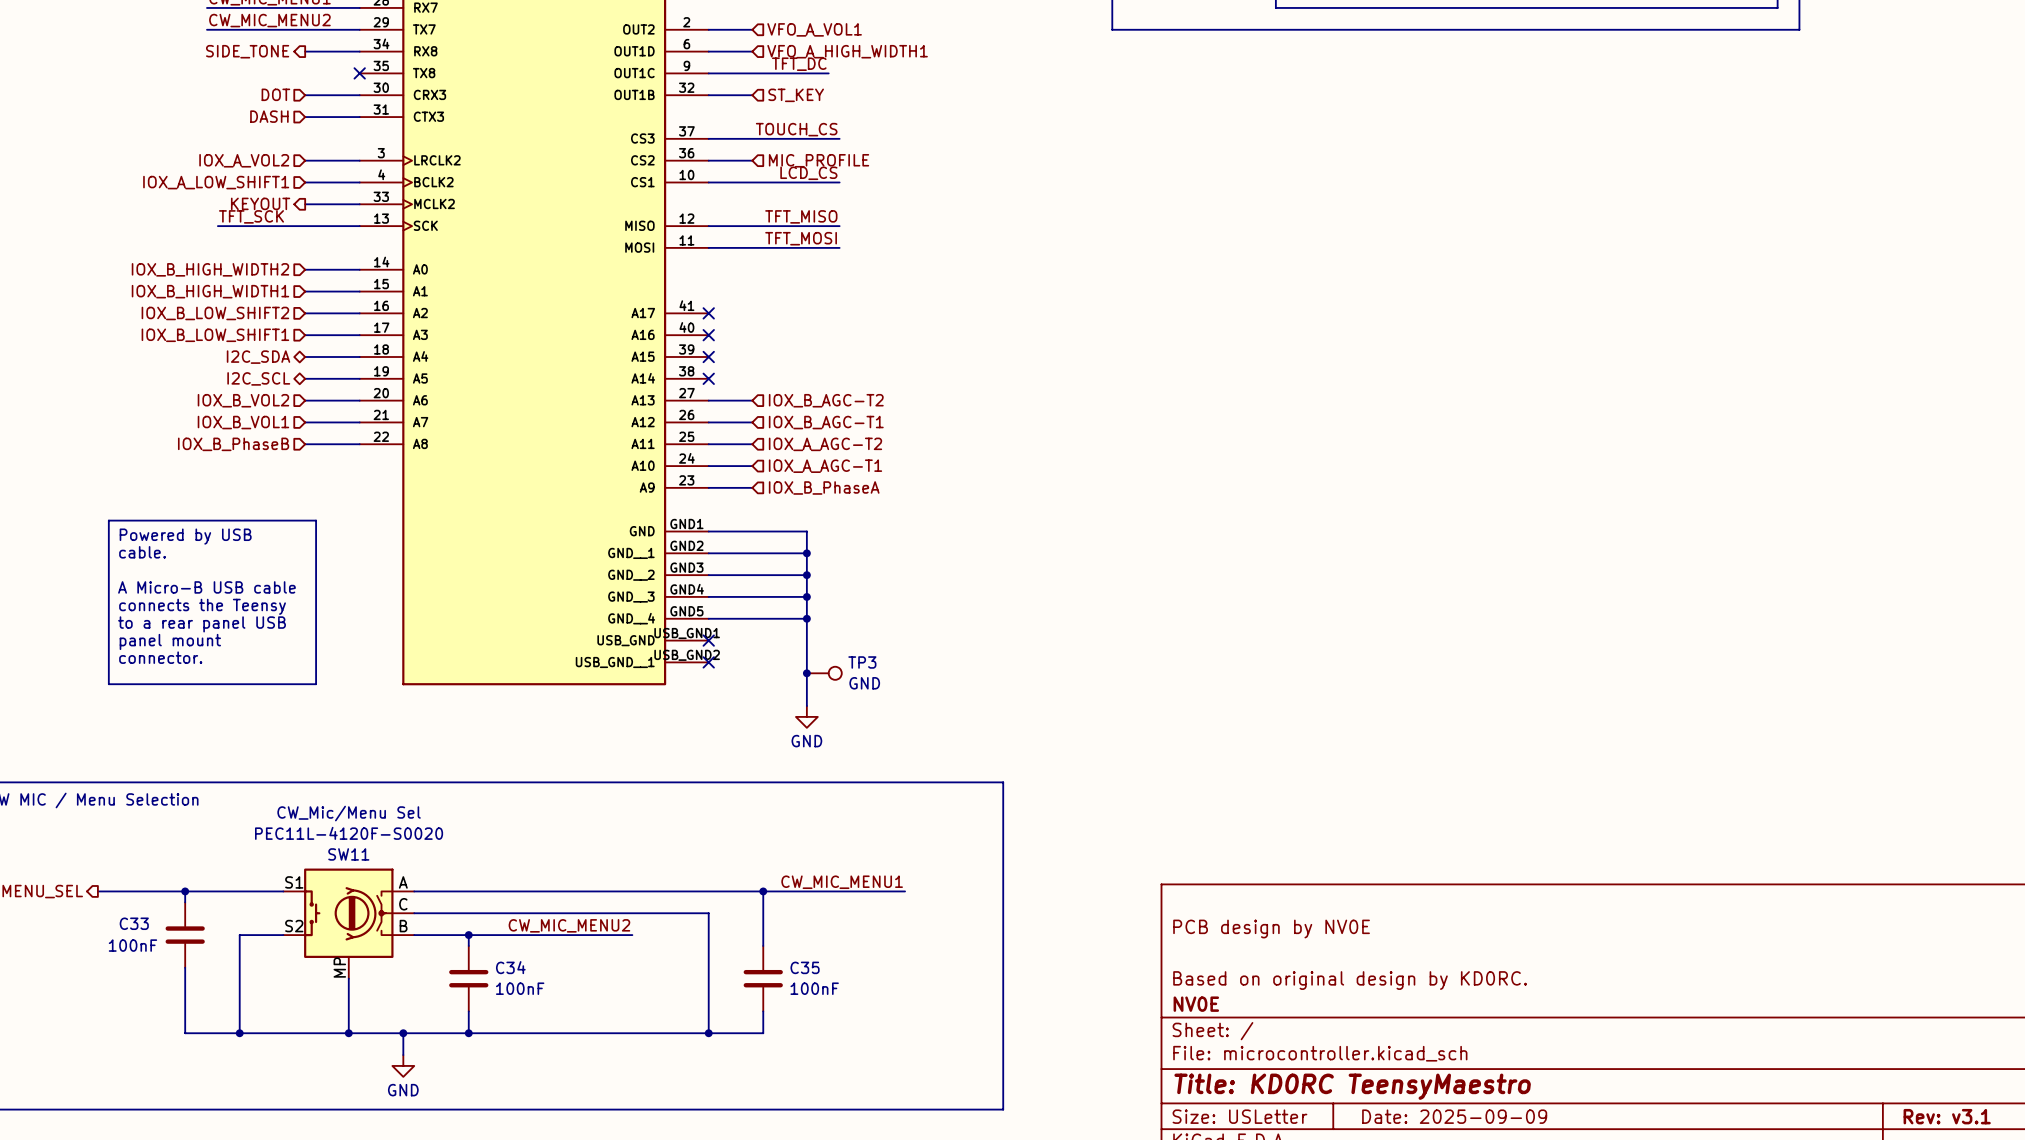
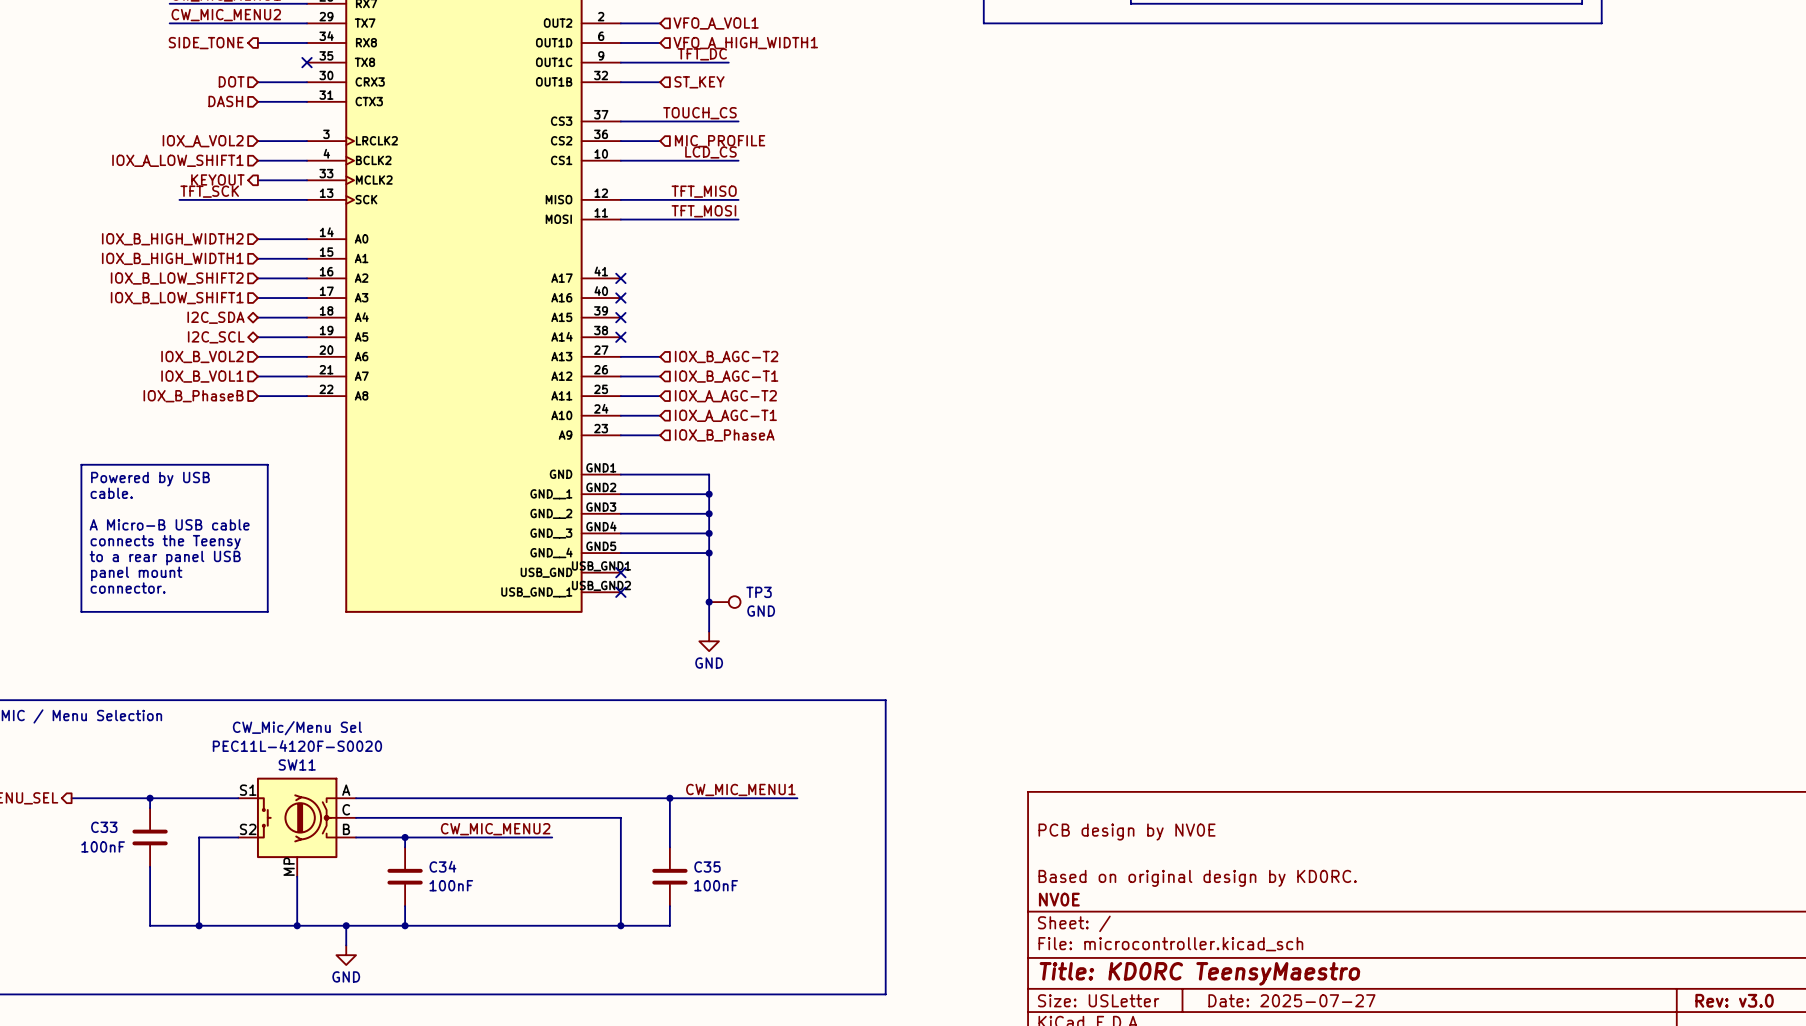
title block: Date: 2025-09-09 (1454, 1116) -> Date: 2025-07-27 (1291, 1000)
title block: Rev: v3.1 (1947, 1116) -> Rev: v3.0 (1734, 1000)

